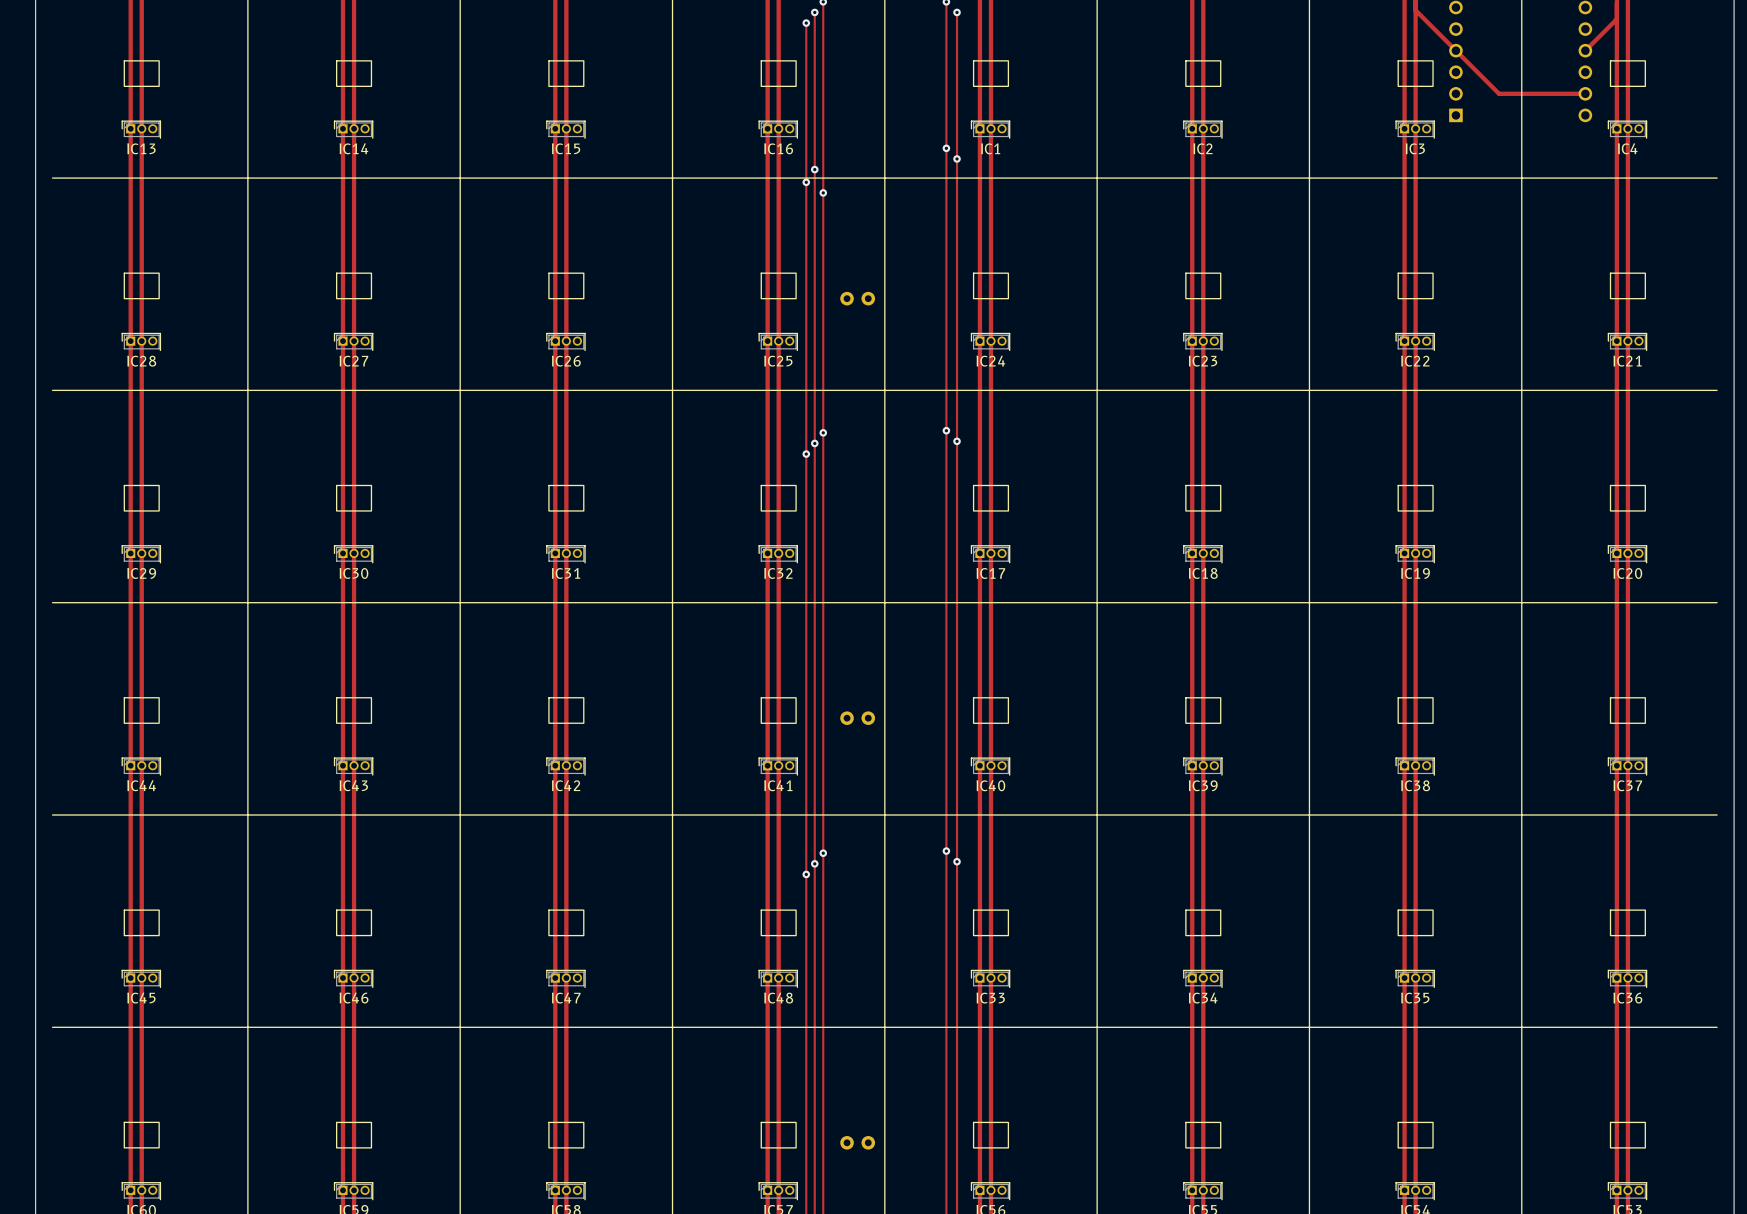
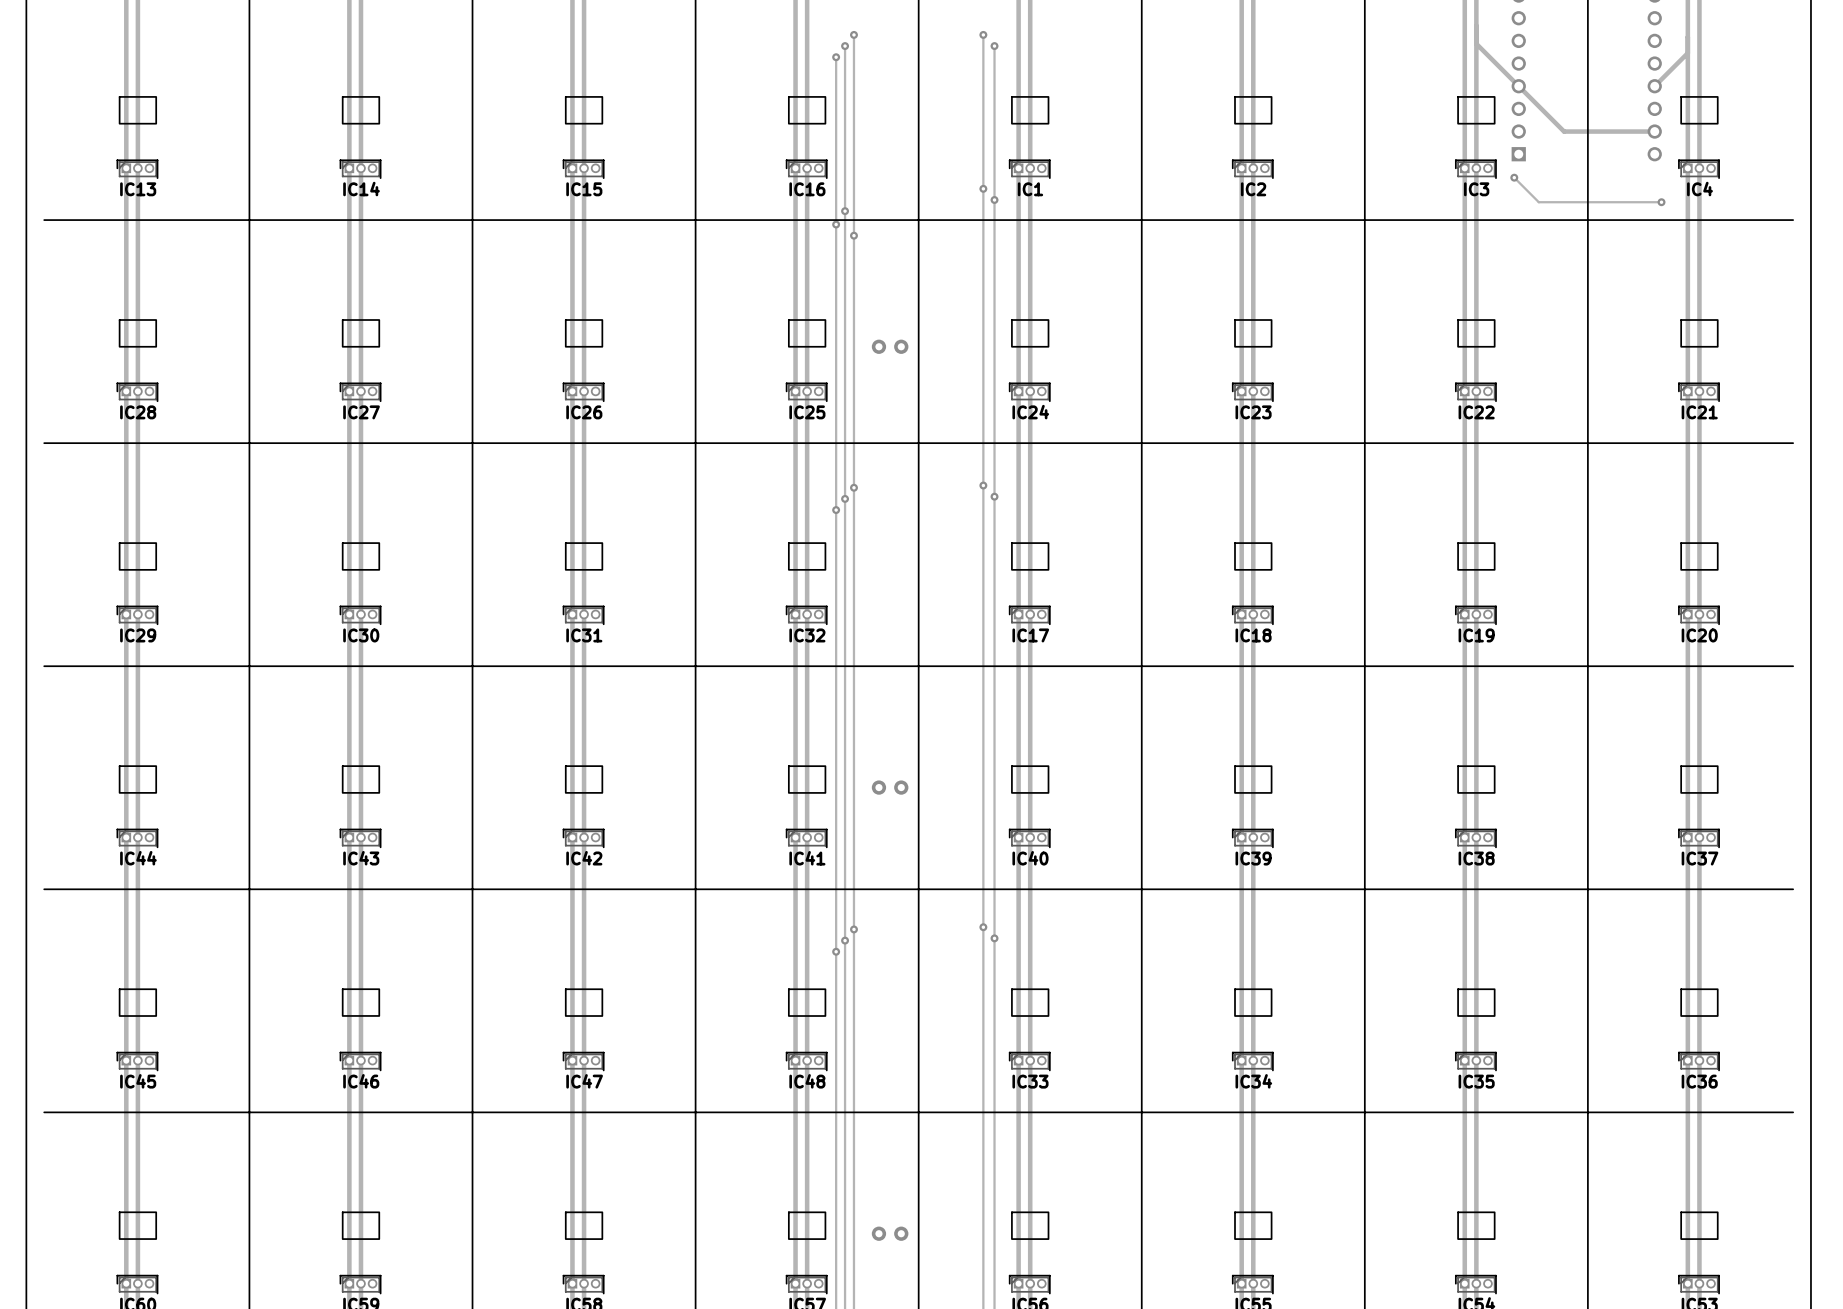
track: none -> (1514, 177) (1538, 202) (1661, 202)
via: none -> (1514, 177)
via: none -> (1661, 202)

